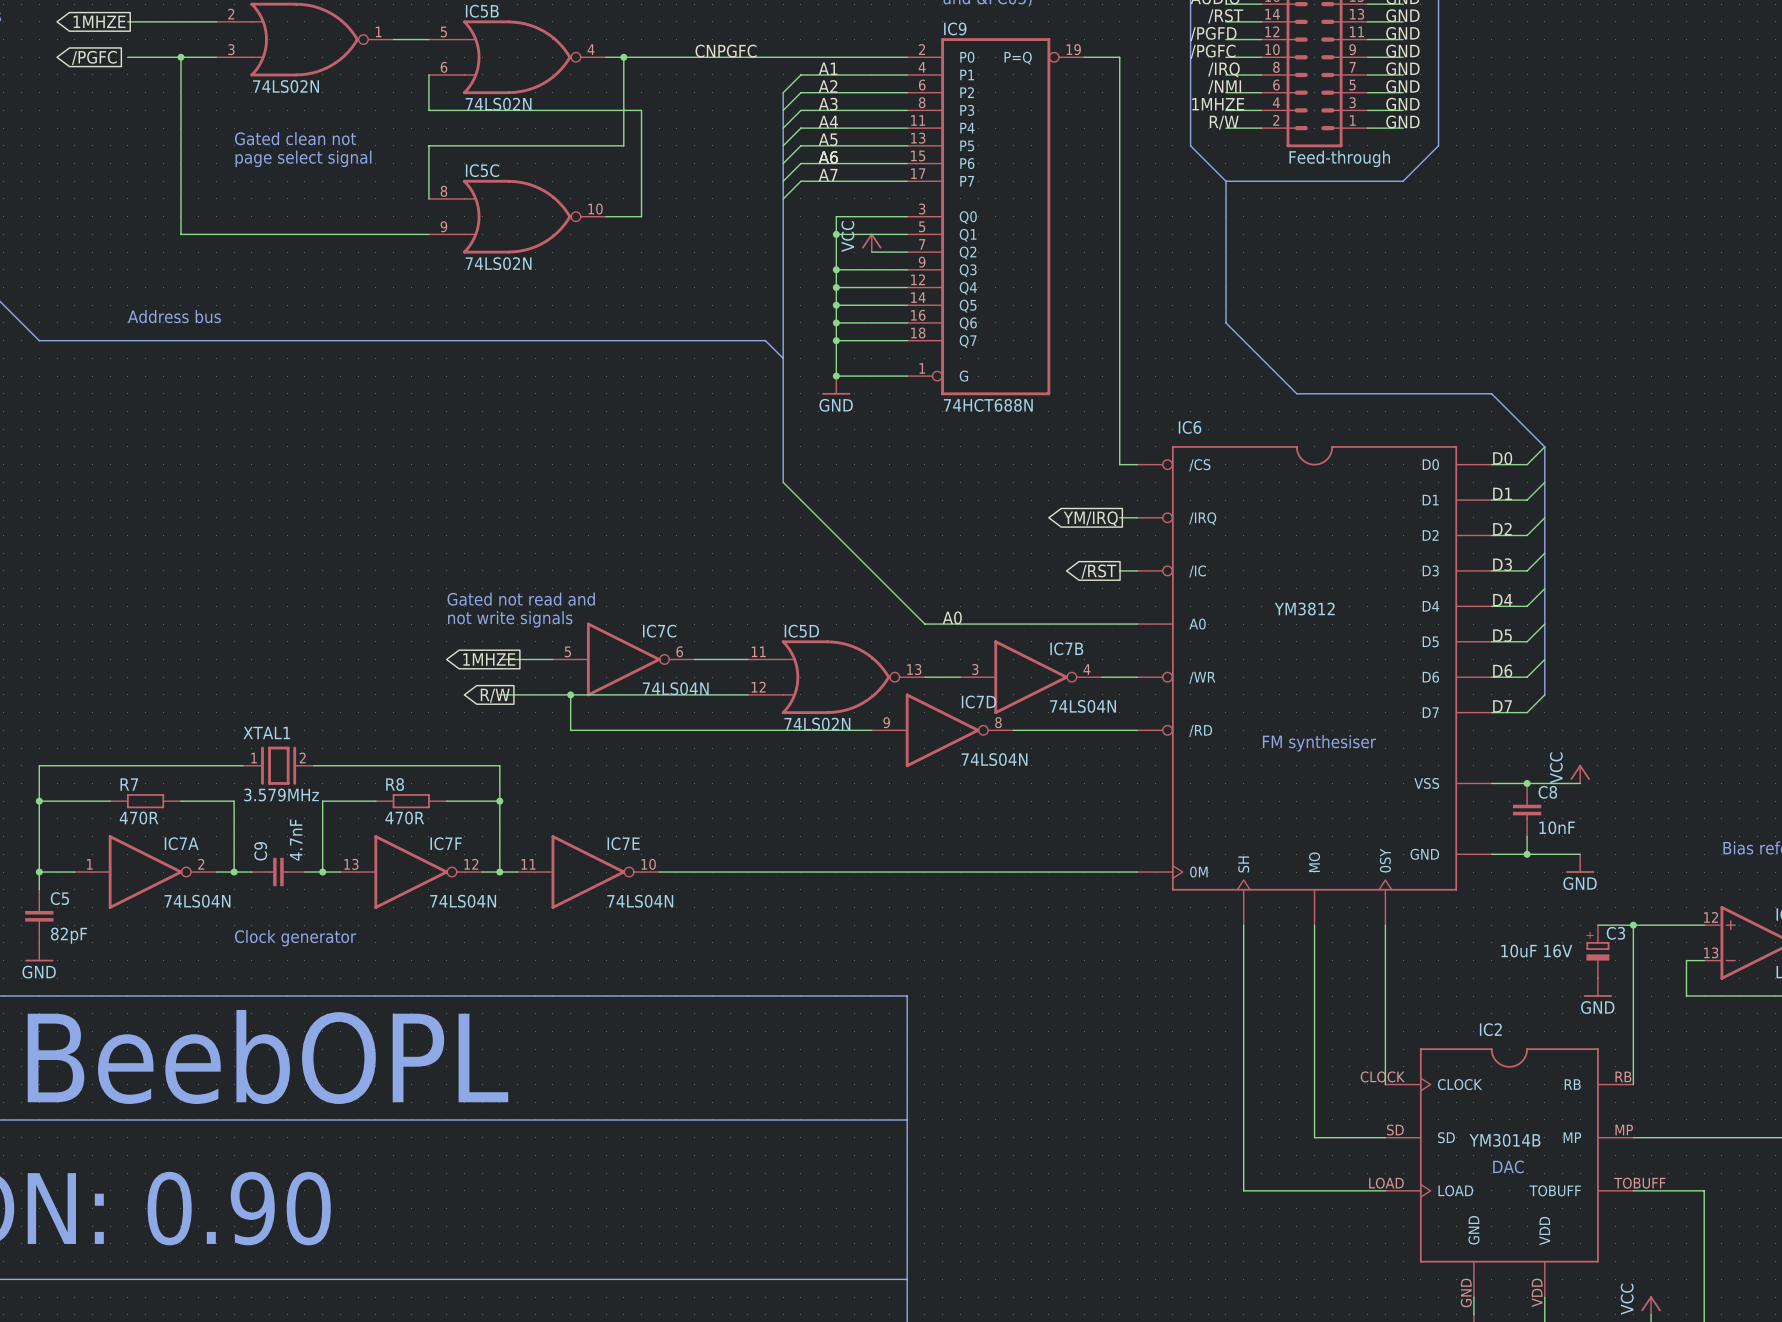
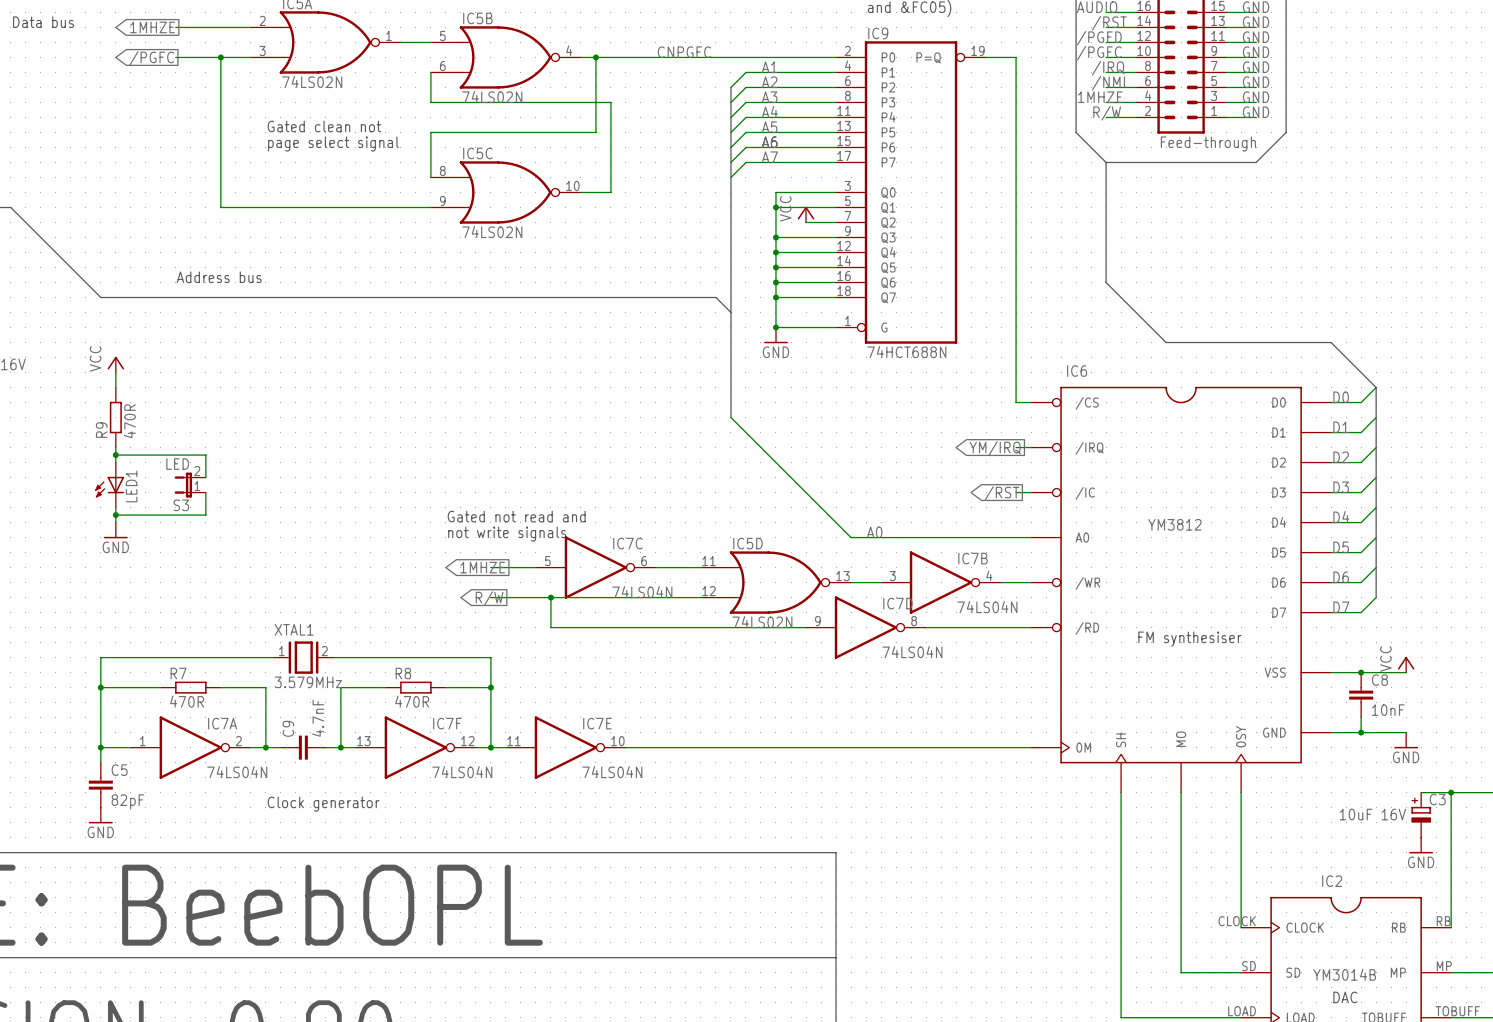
power symbol: none -> VCC (115, 364)
wire: none -> (115, 372) (115, 387)
R9: none -> 470R (115, 417)
wire: none -> (115, 447) (115, 462)
wire: none -> (115, 455) (205, 455) (205, 477)
junction: none -> (115, 455)
LED1: none -> (109, 485)
S3: none -> LED (190, 485)
wire: none -> (205, 492) (205, 515) (115, 515)
wire: none -> (115, 507) (115, 522)
junction: none -> (115, 515)
power symbol: none -> GND (115, 530)

